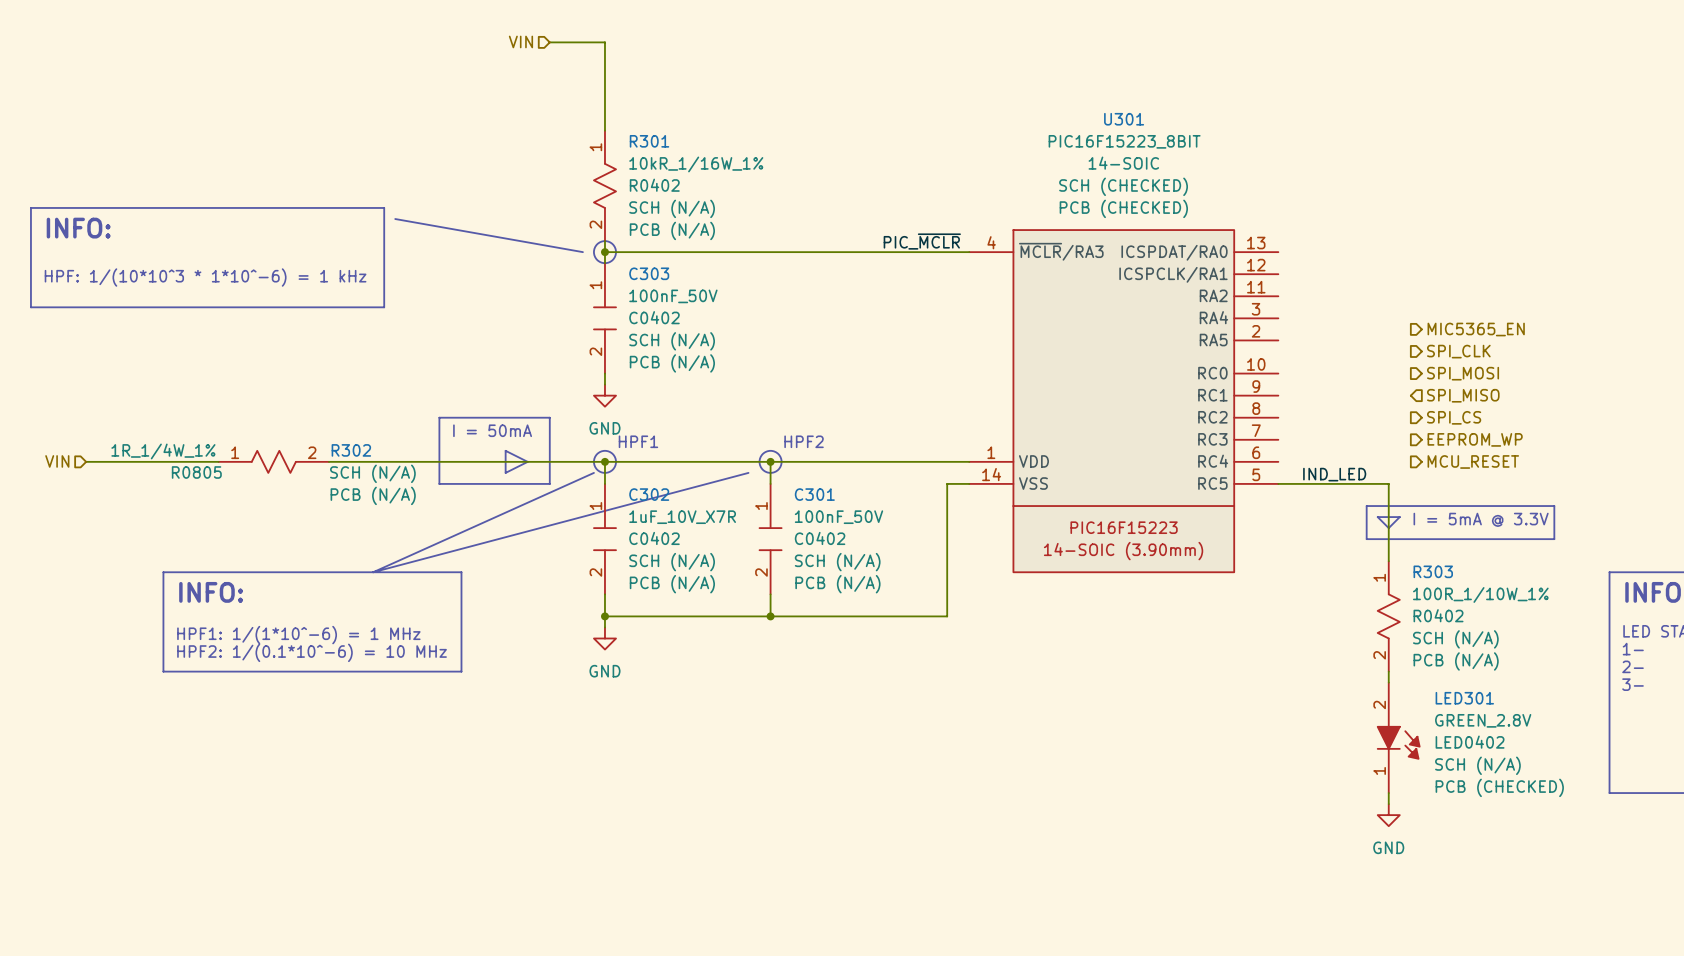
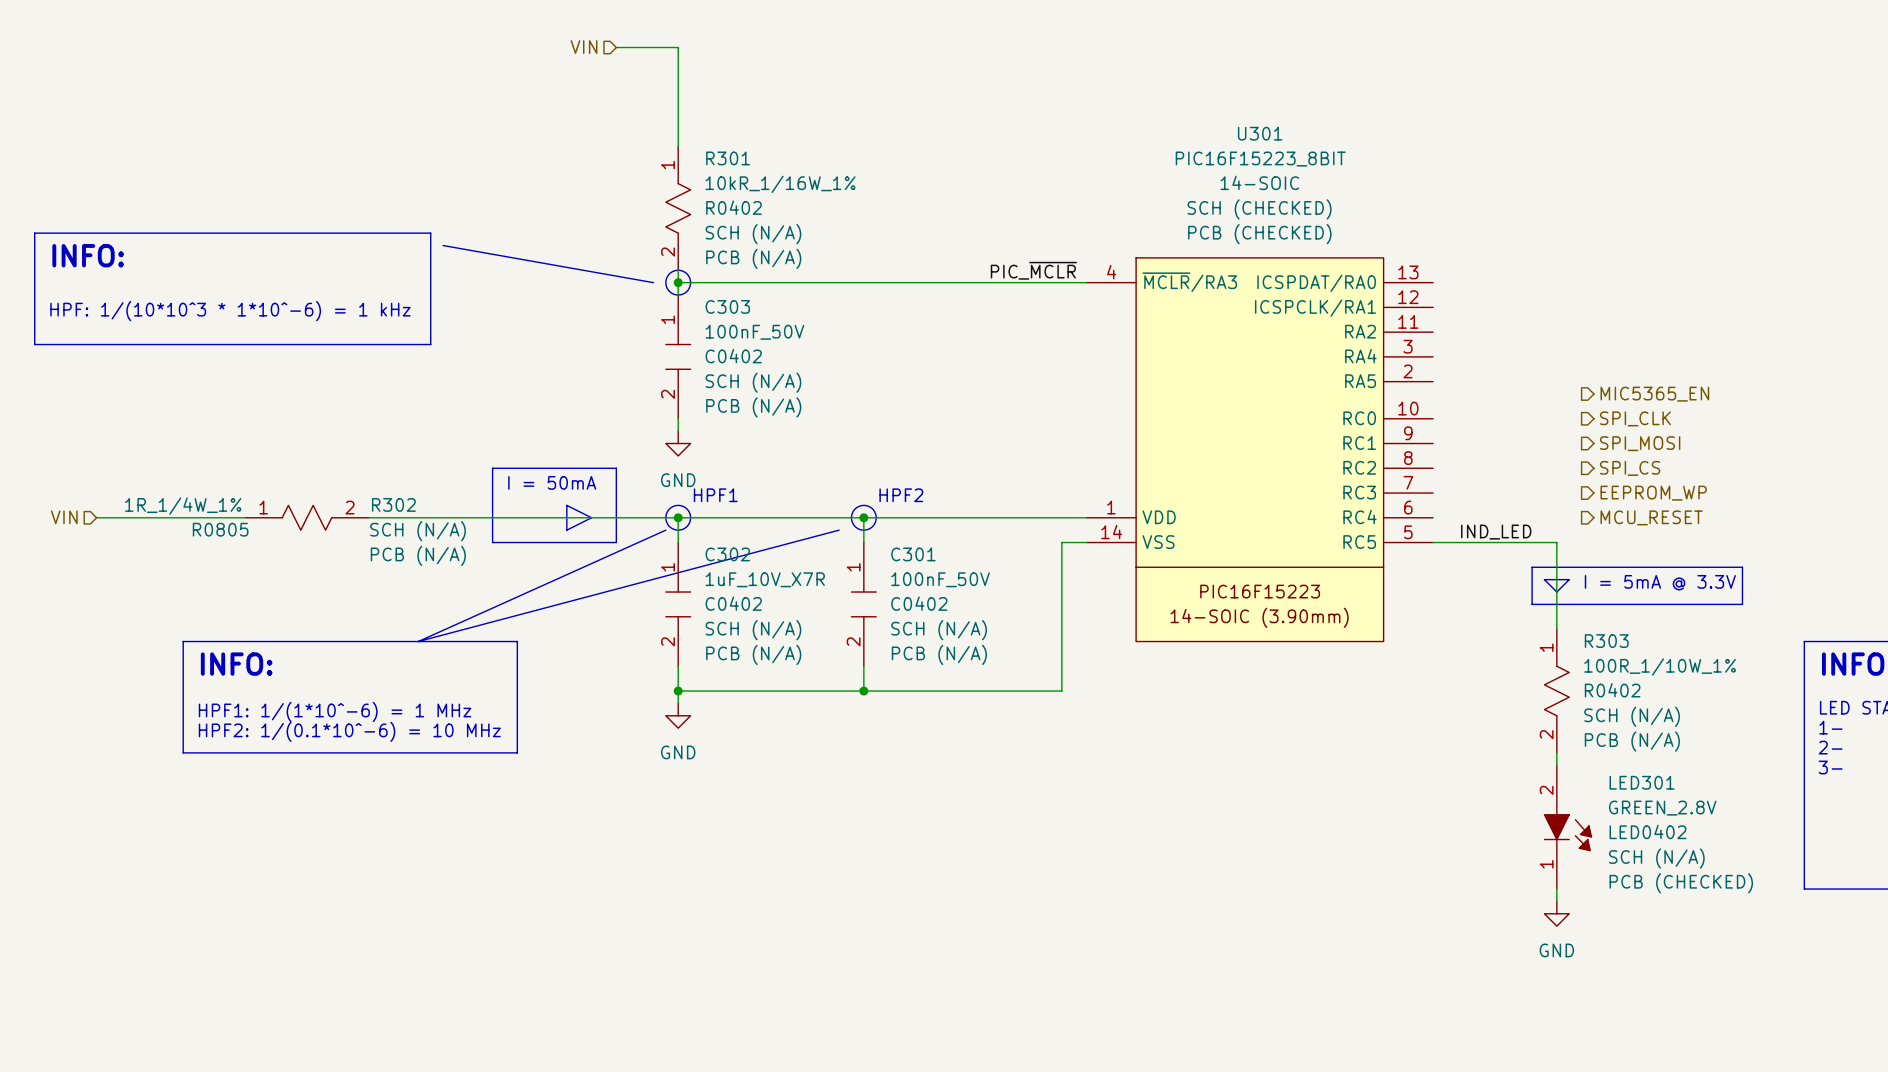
hierarchical label: MIC5365_EN (1476, 329) -> none
hierarchical label: SPI_CLK (1458, 351) -> MIC5365_EN (1654, 394)
hierarchical label: SPI_MOSI (1463, 373) -> SPI_CLK (1635, 418)
hierarchical label shape: input (1463, 395) -> output (1640, 443)
hierarchical label: SPI_MISO (1463, 395) -> SPI_MOSI (1640, 443)

